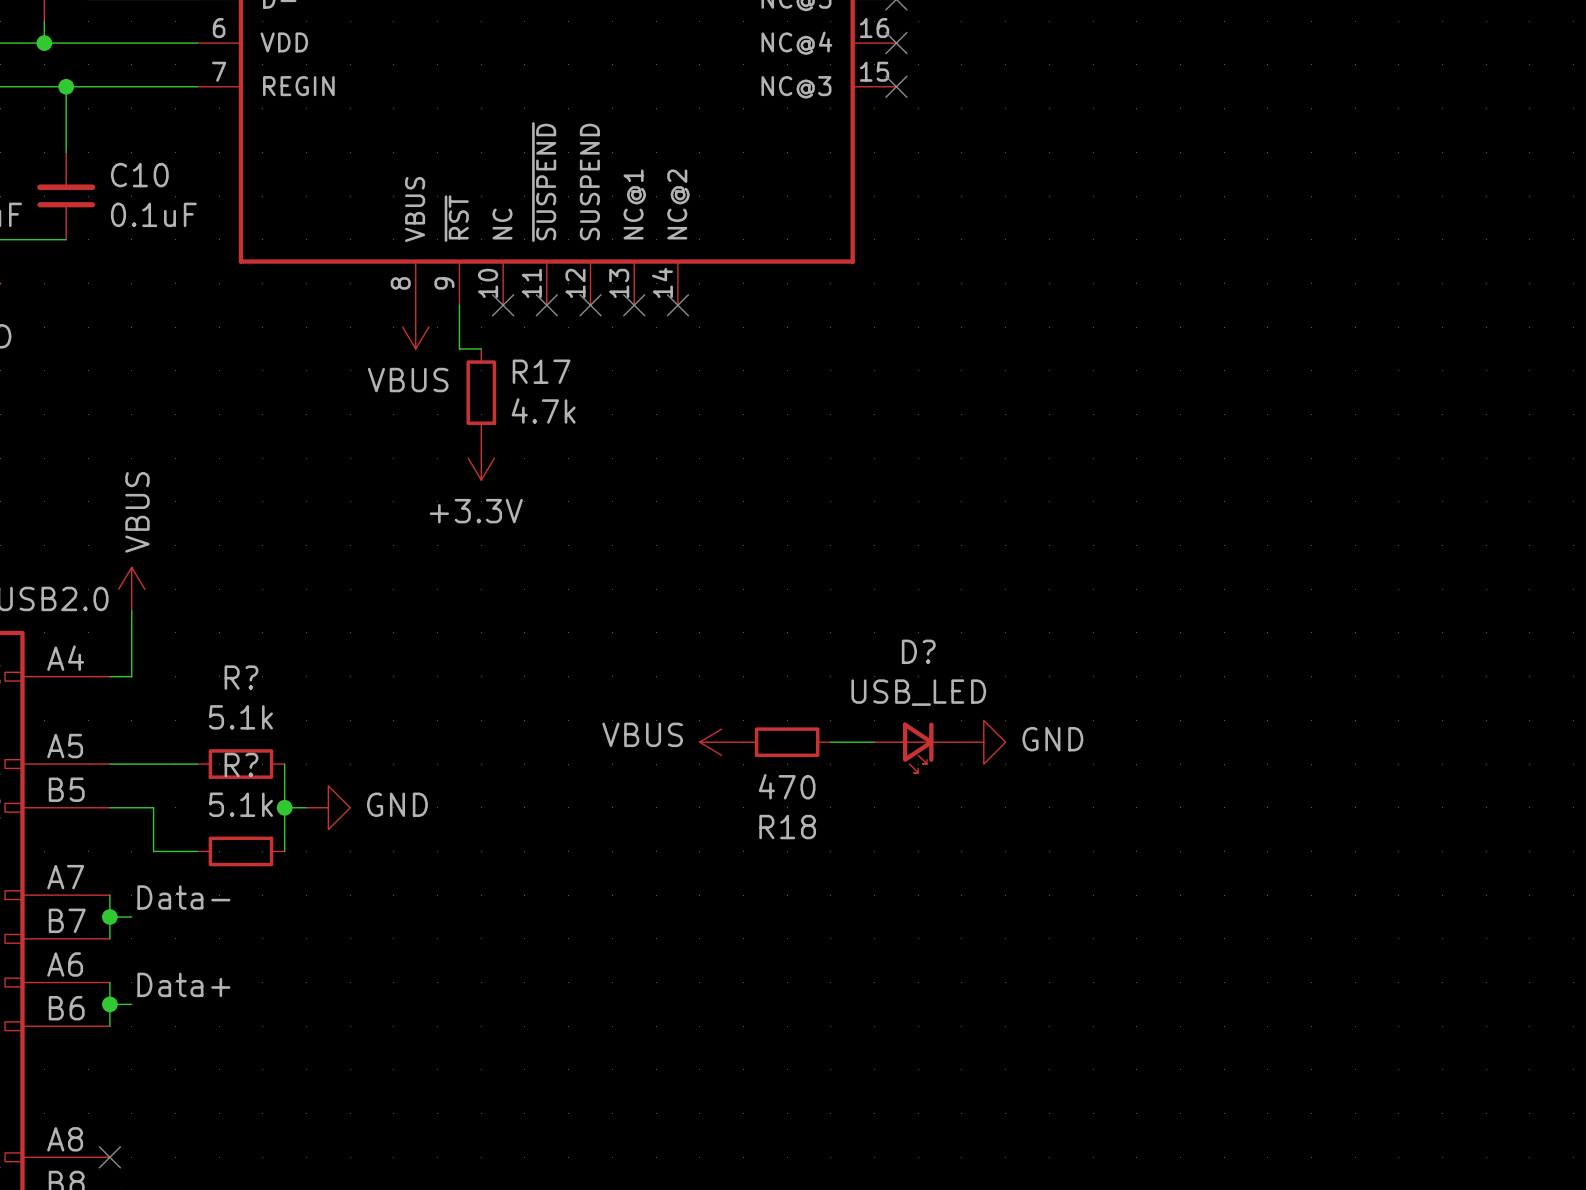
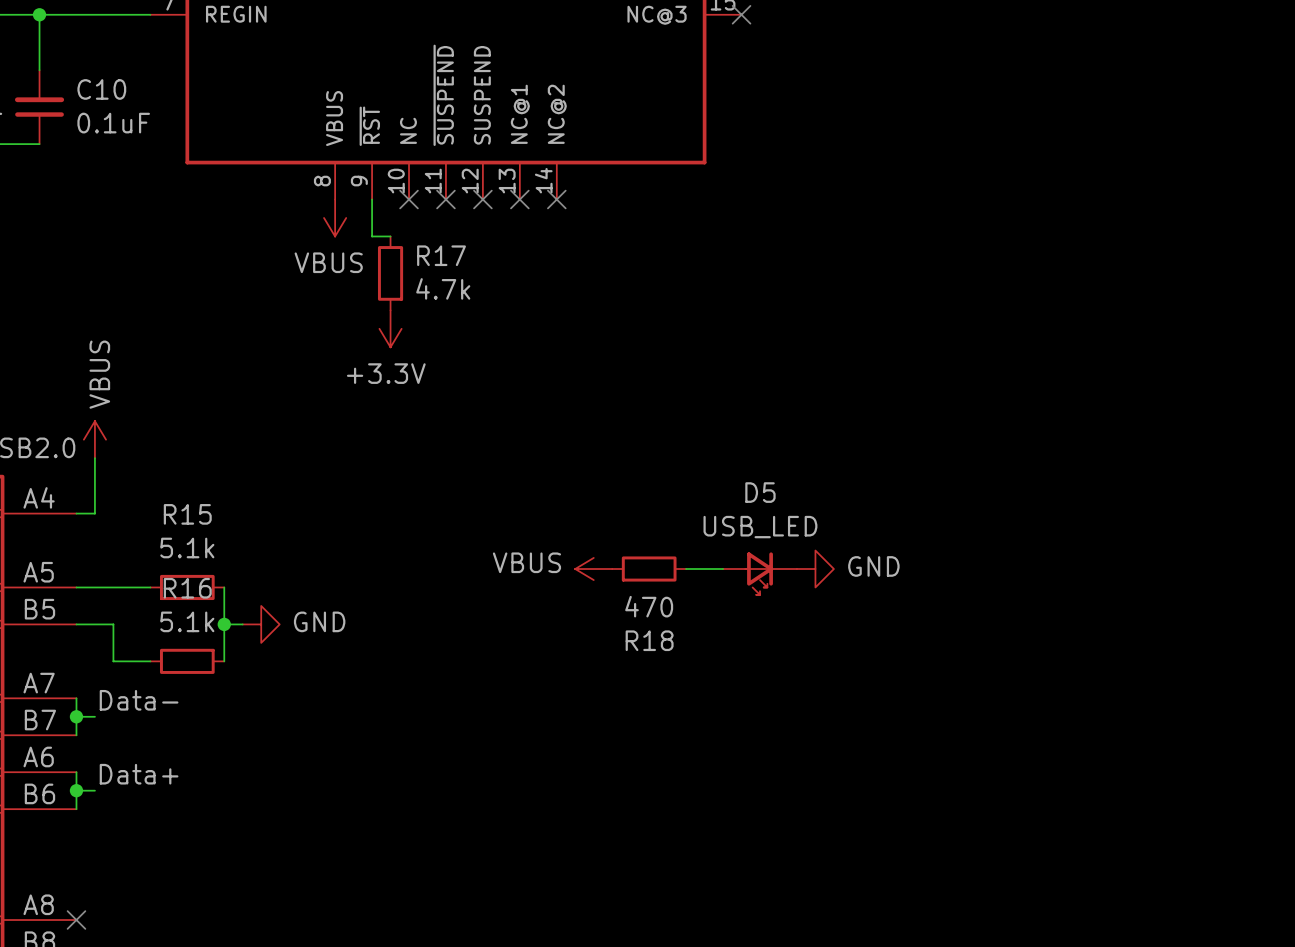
D? name: D? (918, 651) -> D5 (760, 492)
R? name: R? (241, 677) -> R15 (187, 514)
R? name: R? (241, 764) -> R16 (187, 588)

